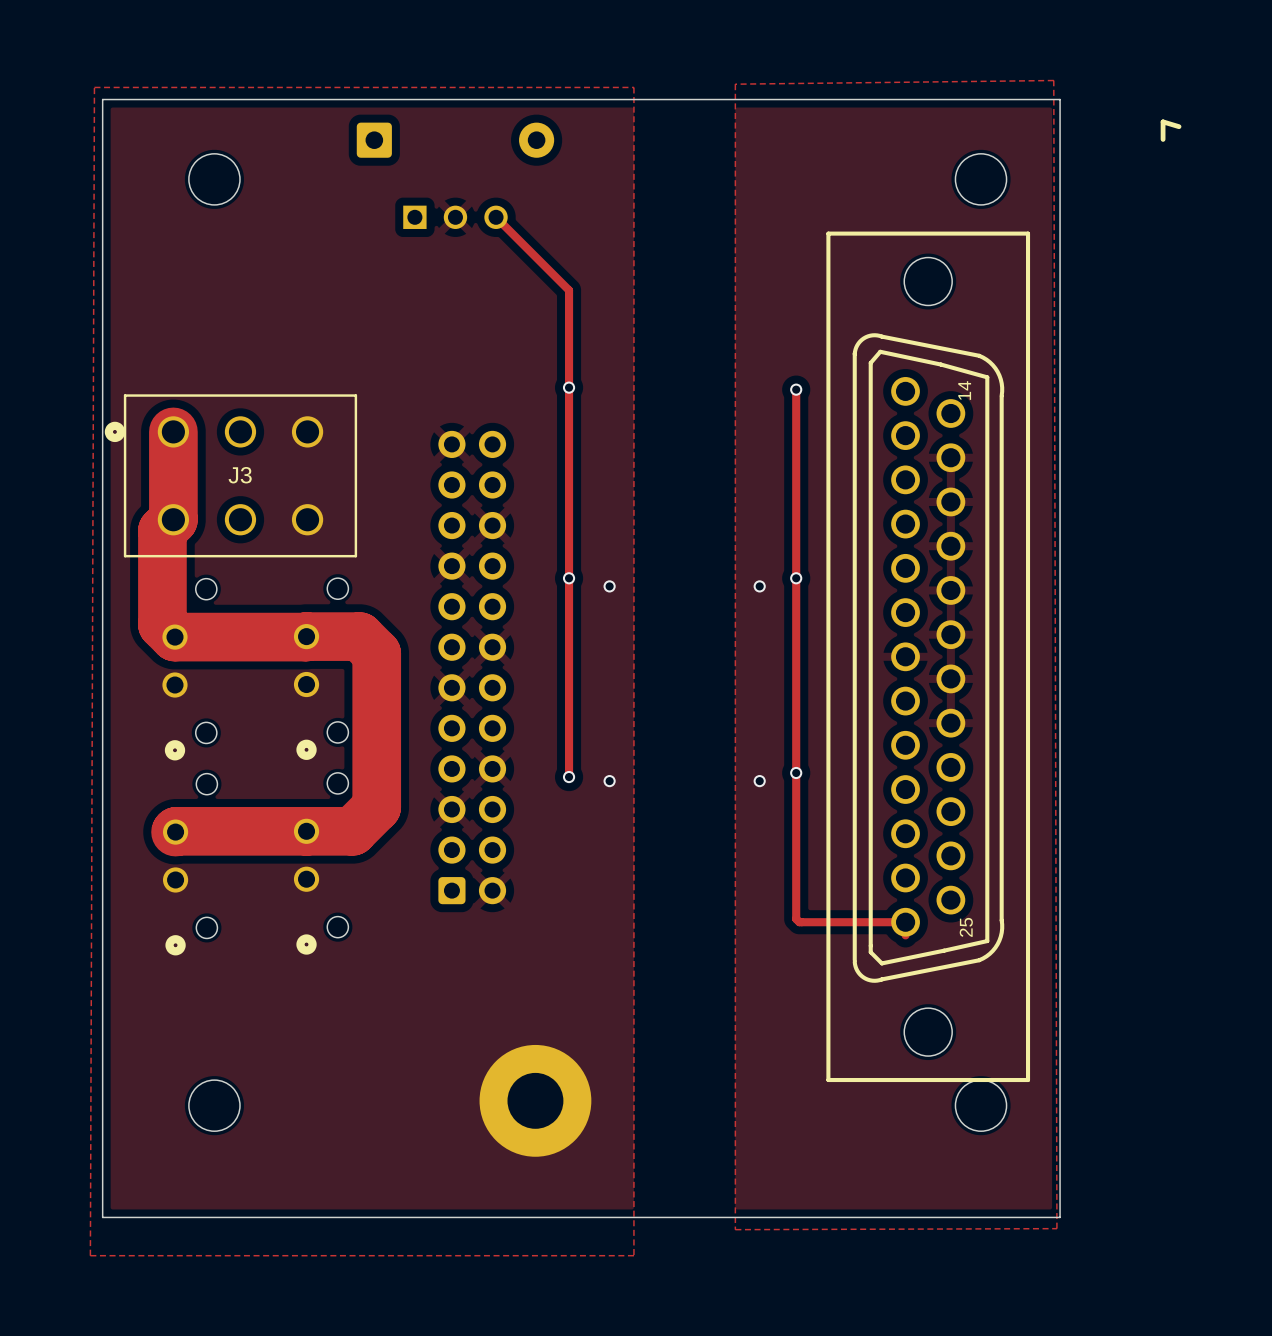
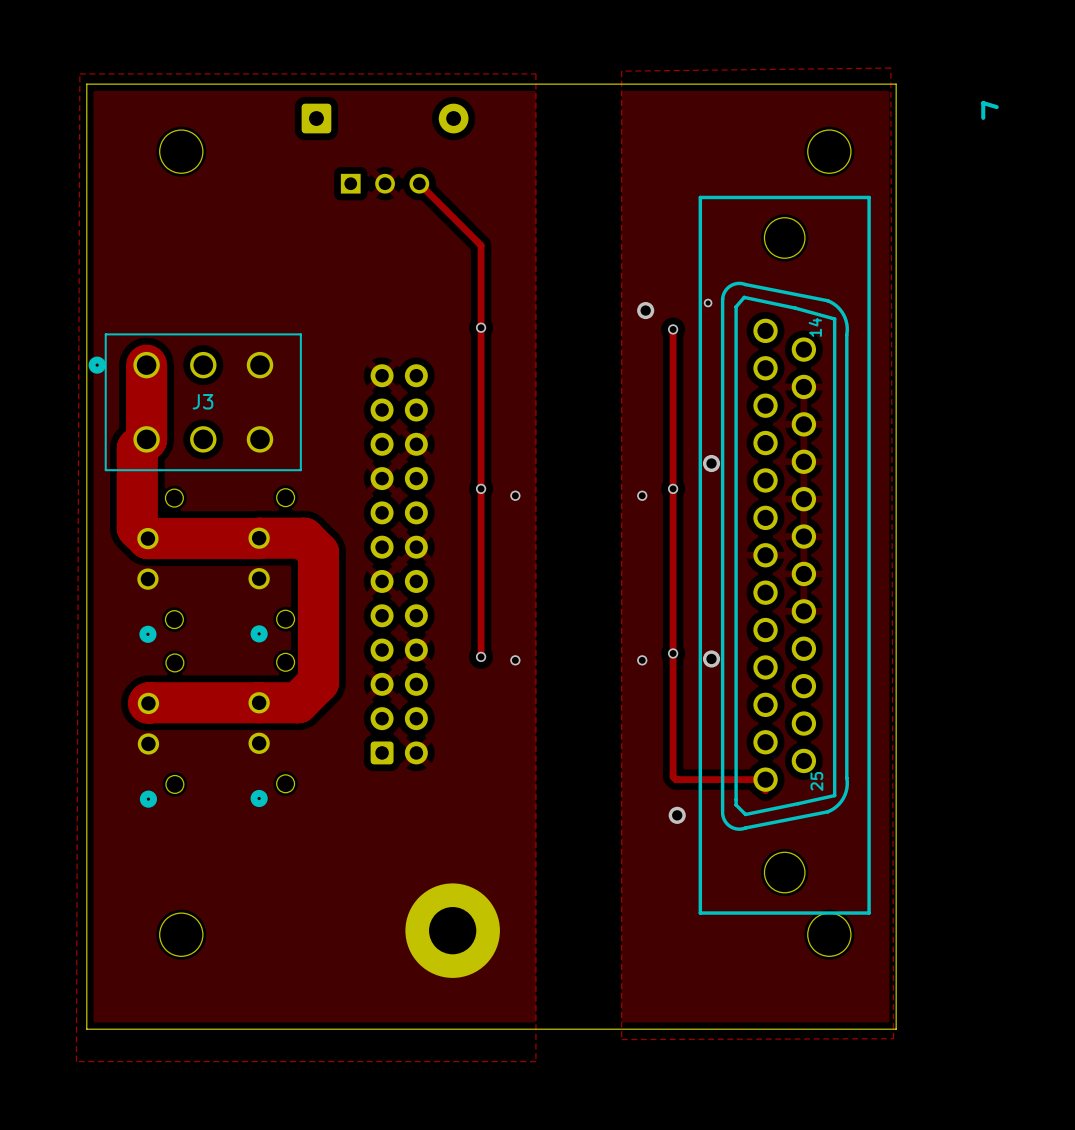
via: none -> (708, 303)
via: none -> (645, 310)
via: none -> (711, 463)
via: none -> (711, 658)
via: none -> (677, 815)

